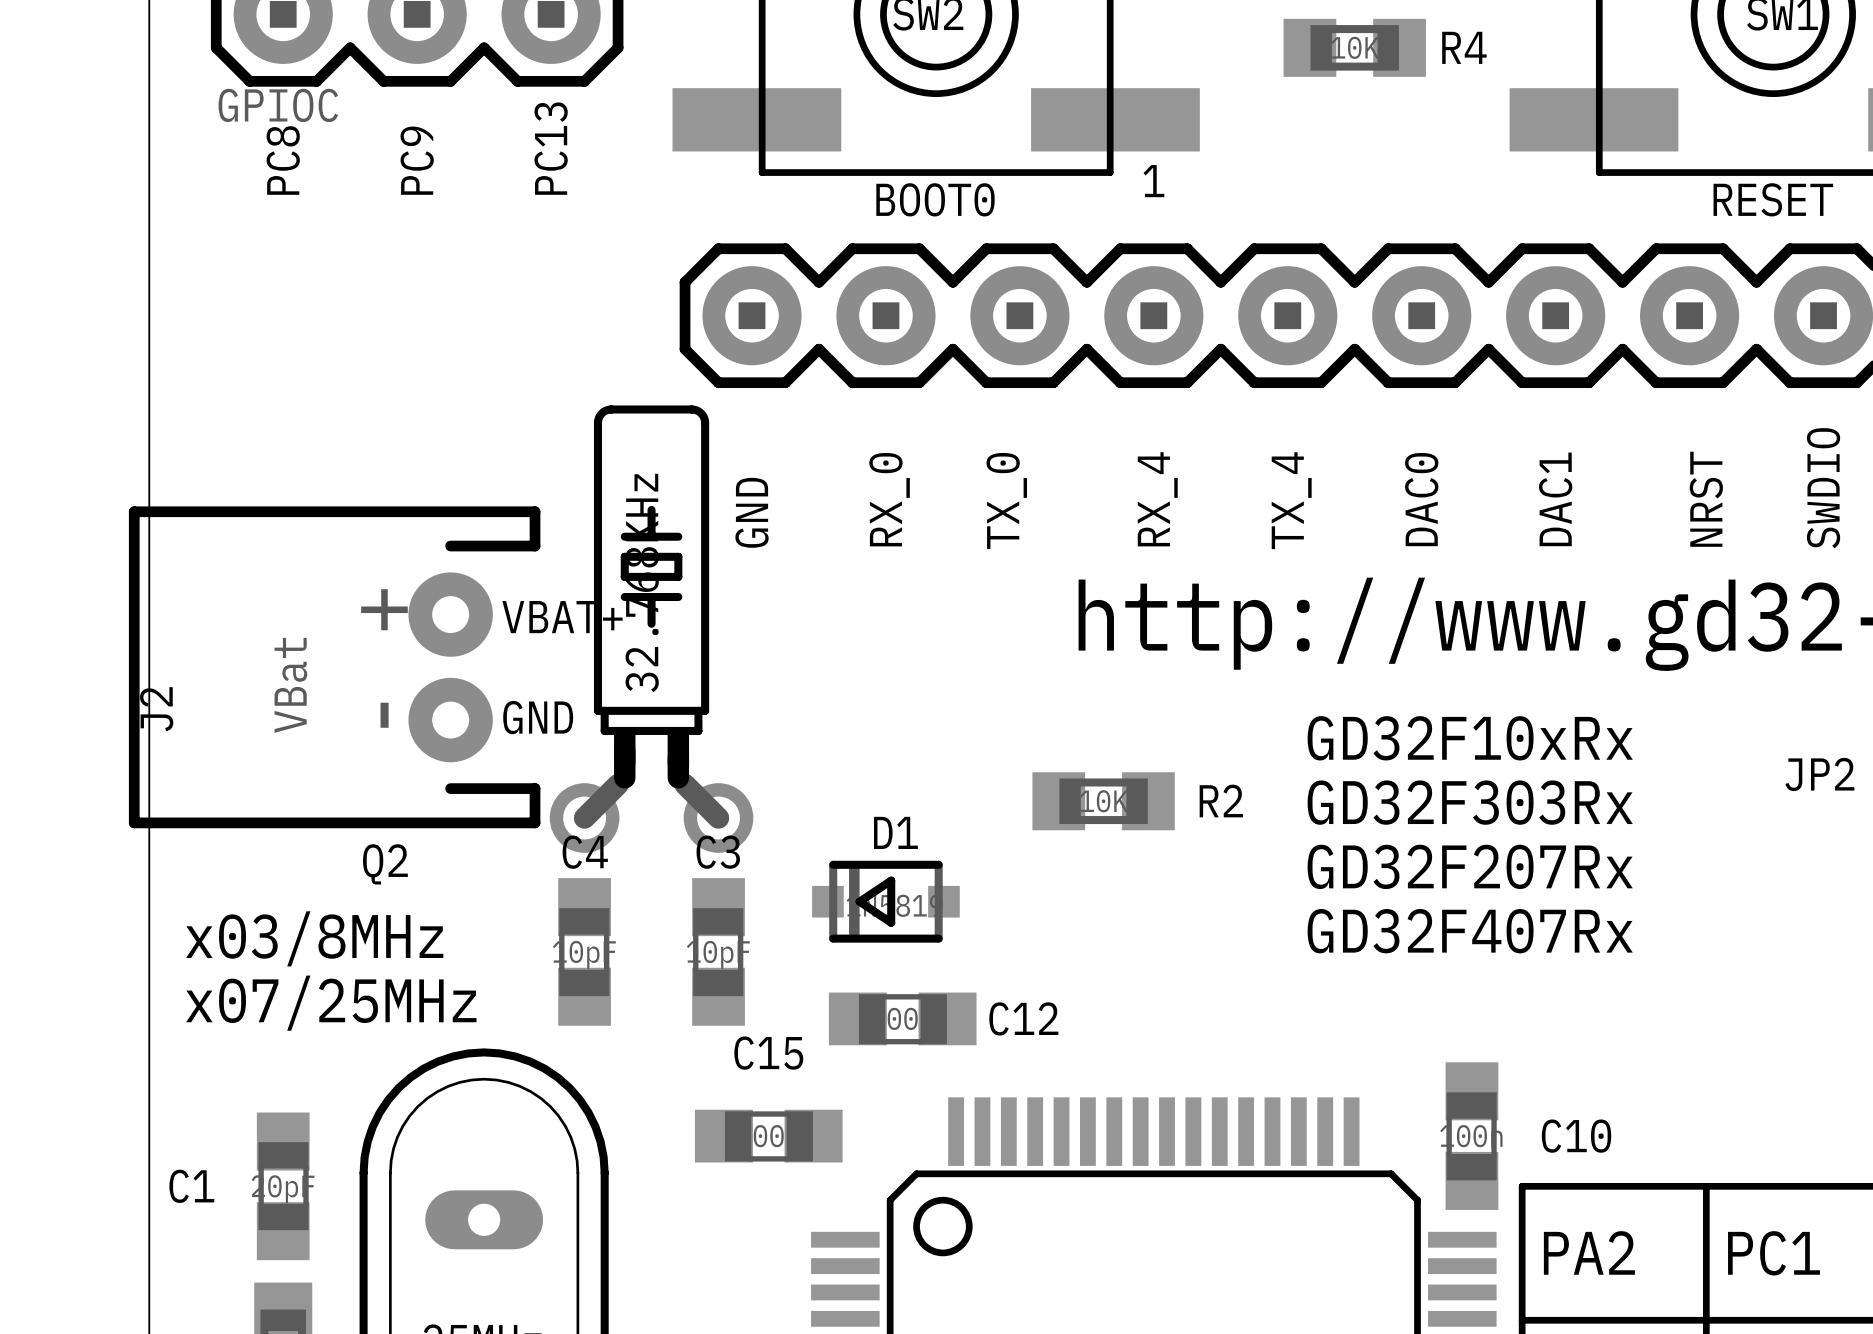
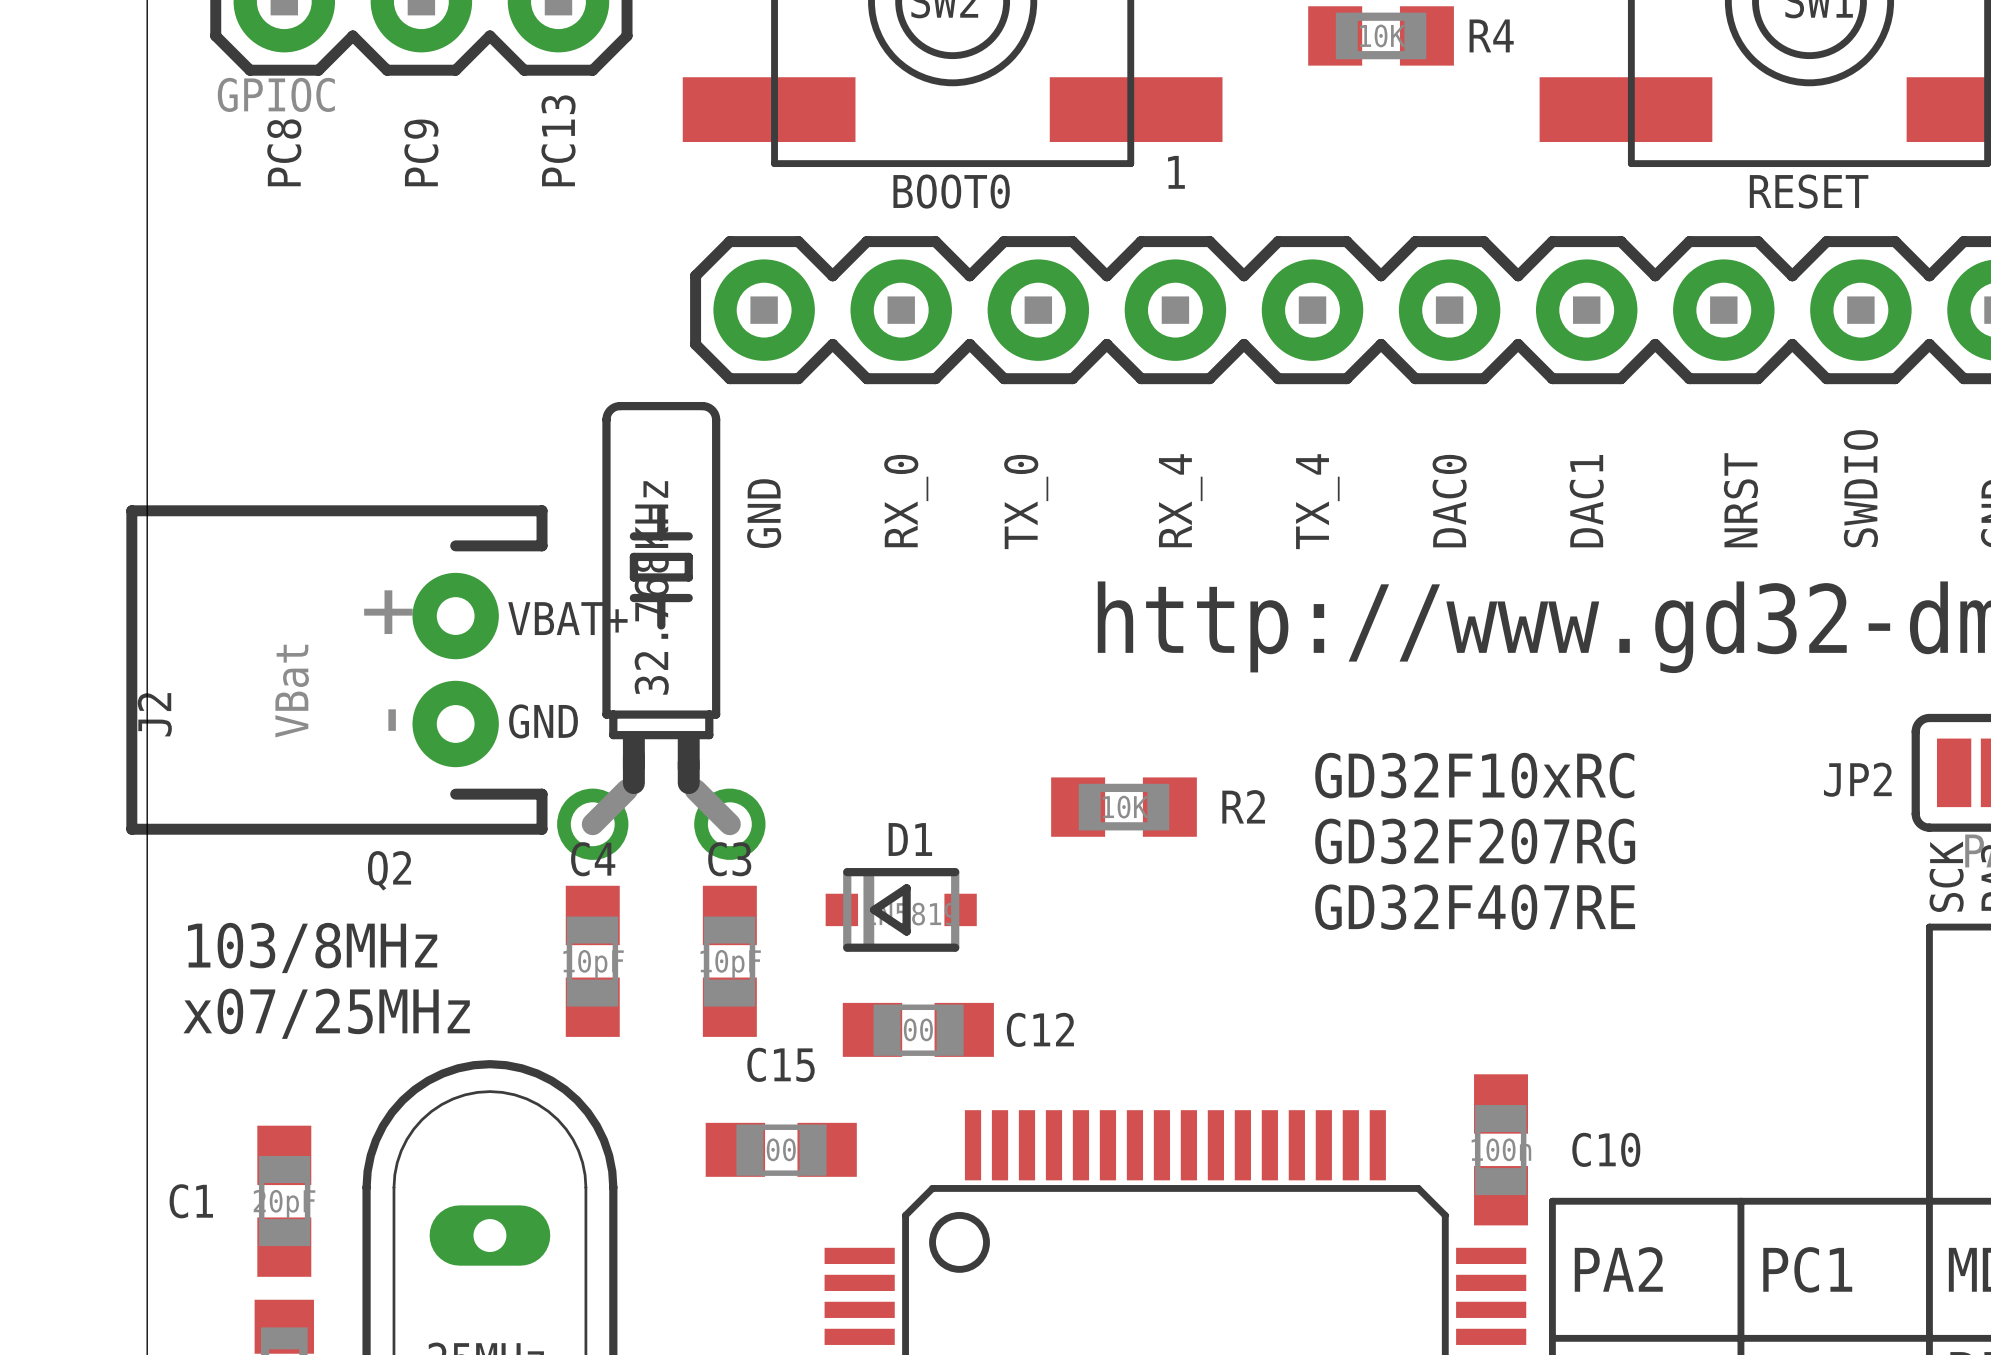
text: GD32F10xRx (1470, 738) -> none
text: none -> GD32F10xRC (1474, 775)
text: GD32F303Rx (1470, 802) -> none
text: none -> GD32F207RG (1475, 841)
text: GD32F207Rx (1470, 866) -> none
text: none -> GD32F407RE (1475, 907)
text: GD32F407Rx (1470, 931) -> none
text: x03/8MHz (314, 938) -> 103/8MHz (312, 947)

